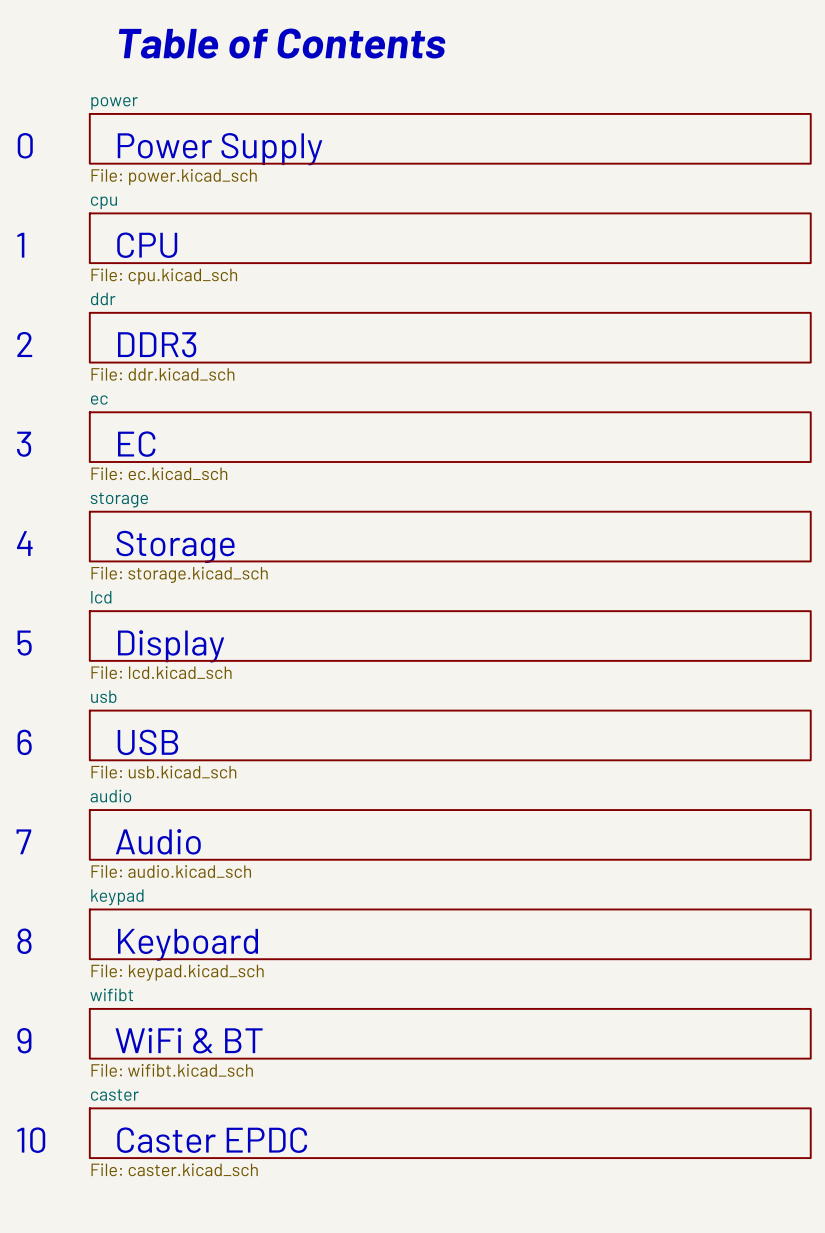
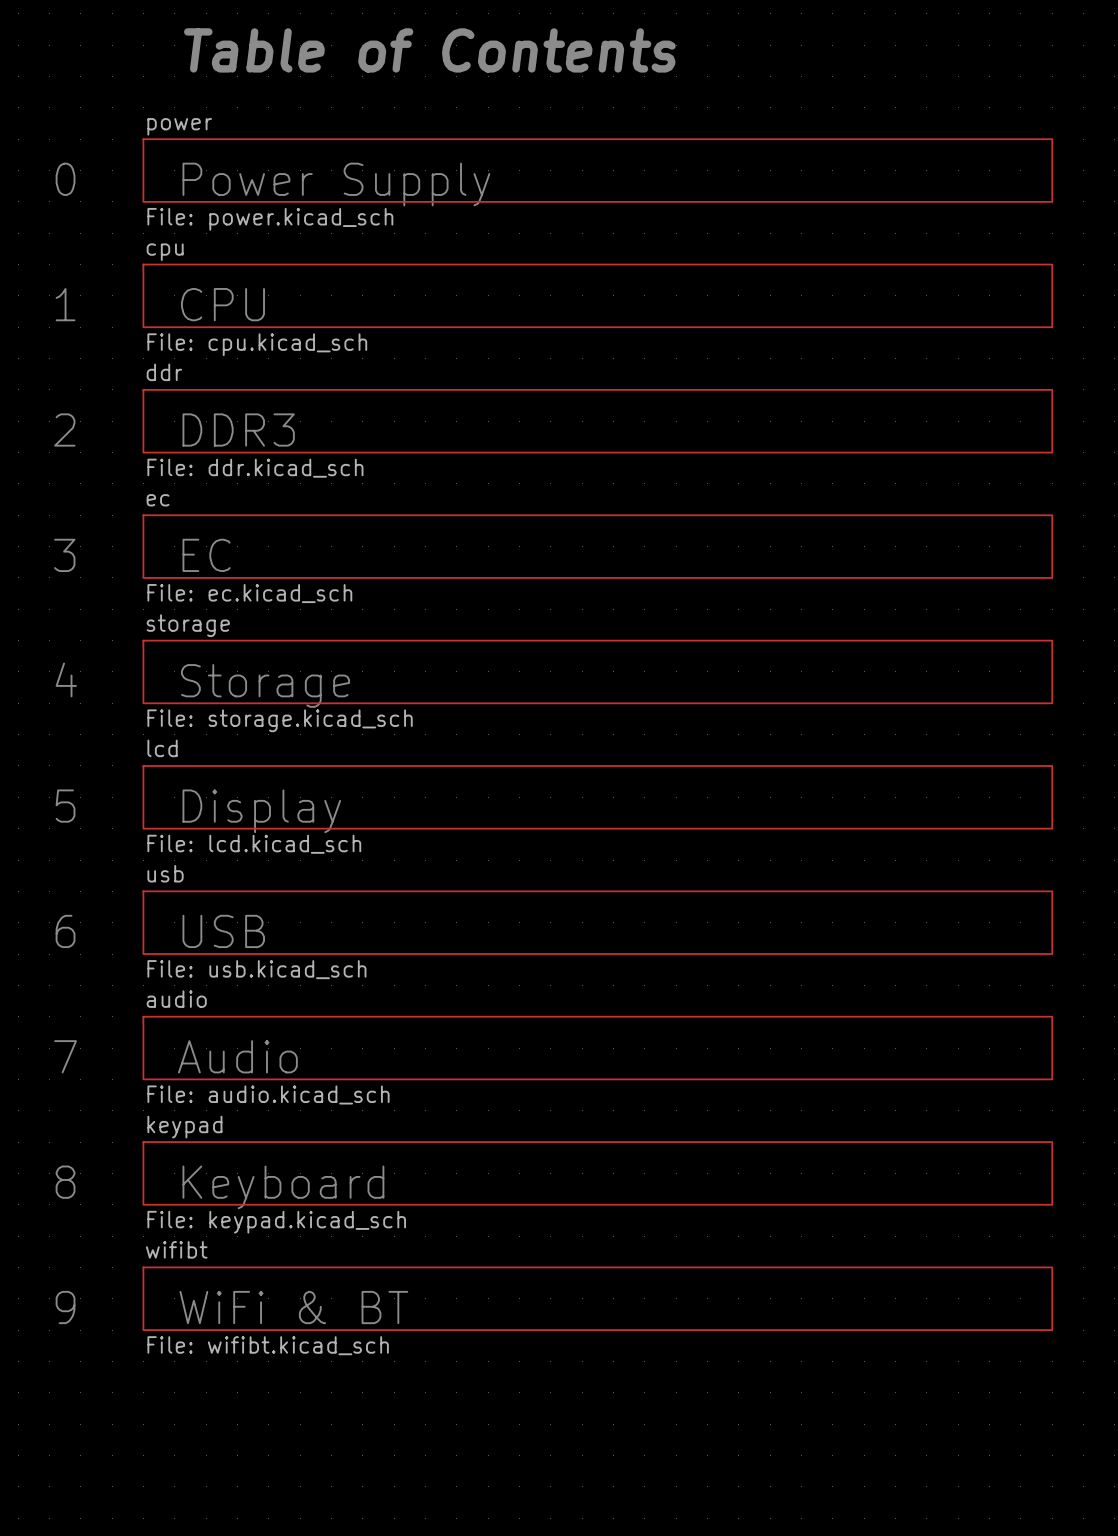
sheet caster: File: caster.kicad_sch (450, 1133) -> none
text: 10 (31, 1140) -> none
text: Caster EPDC (212, 1140) -> none

